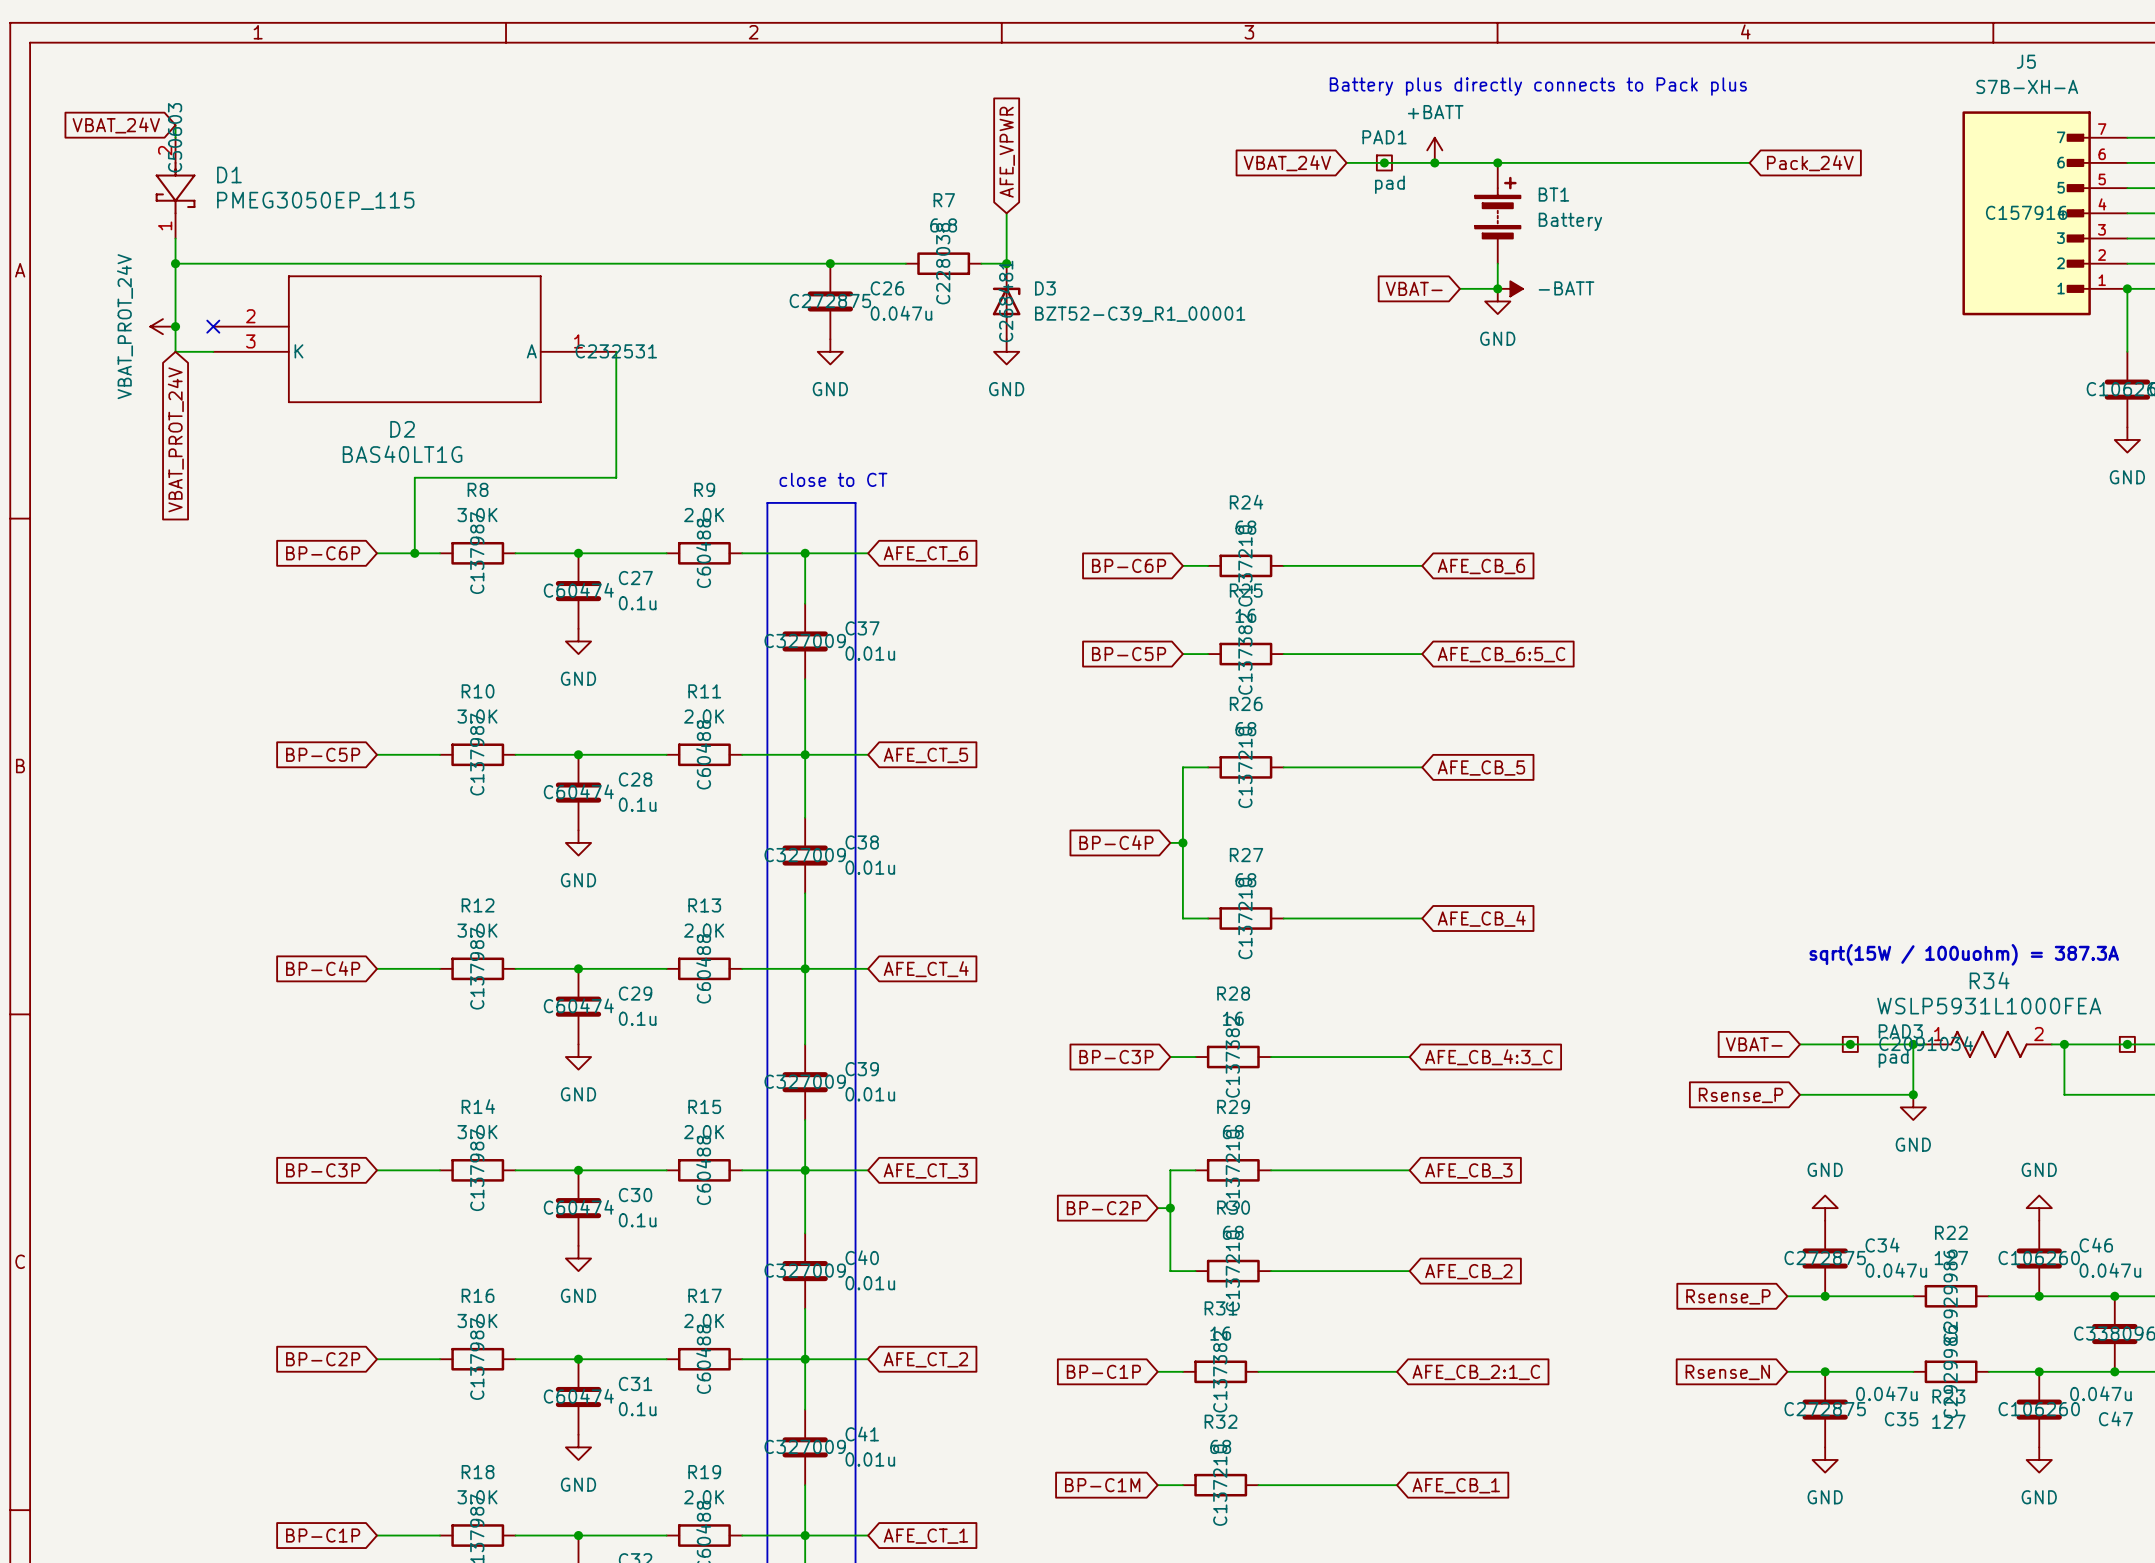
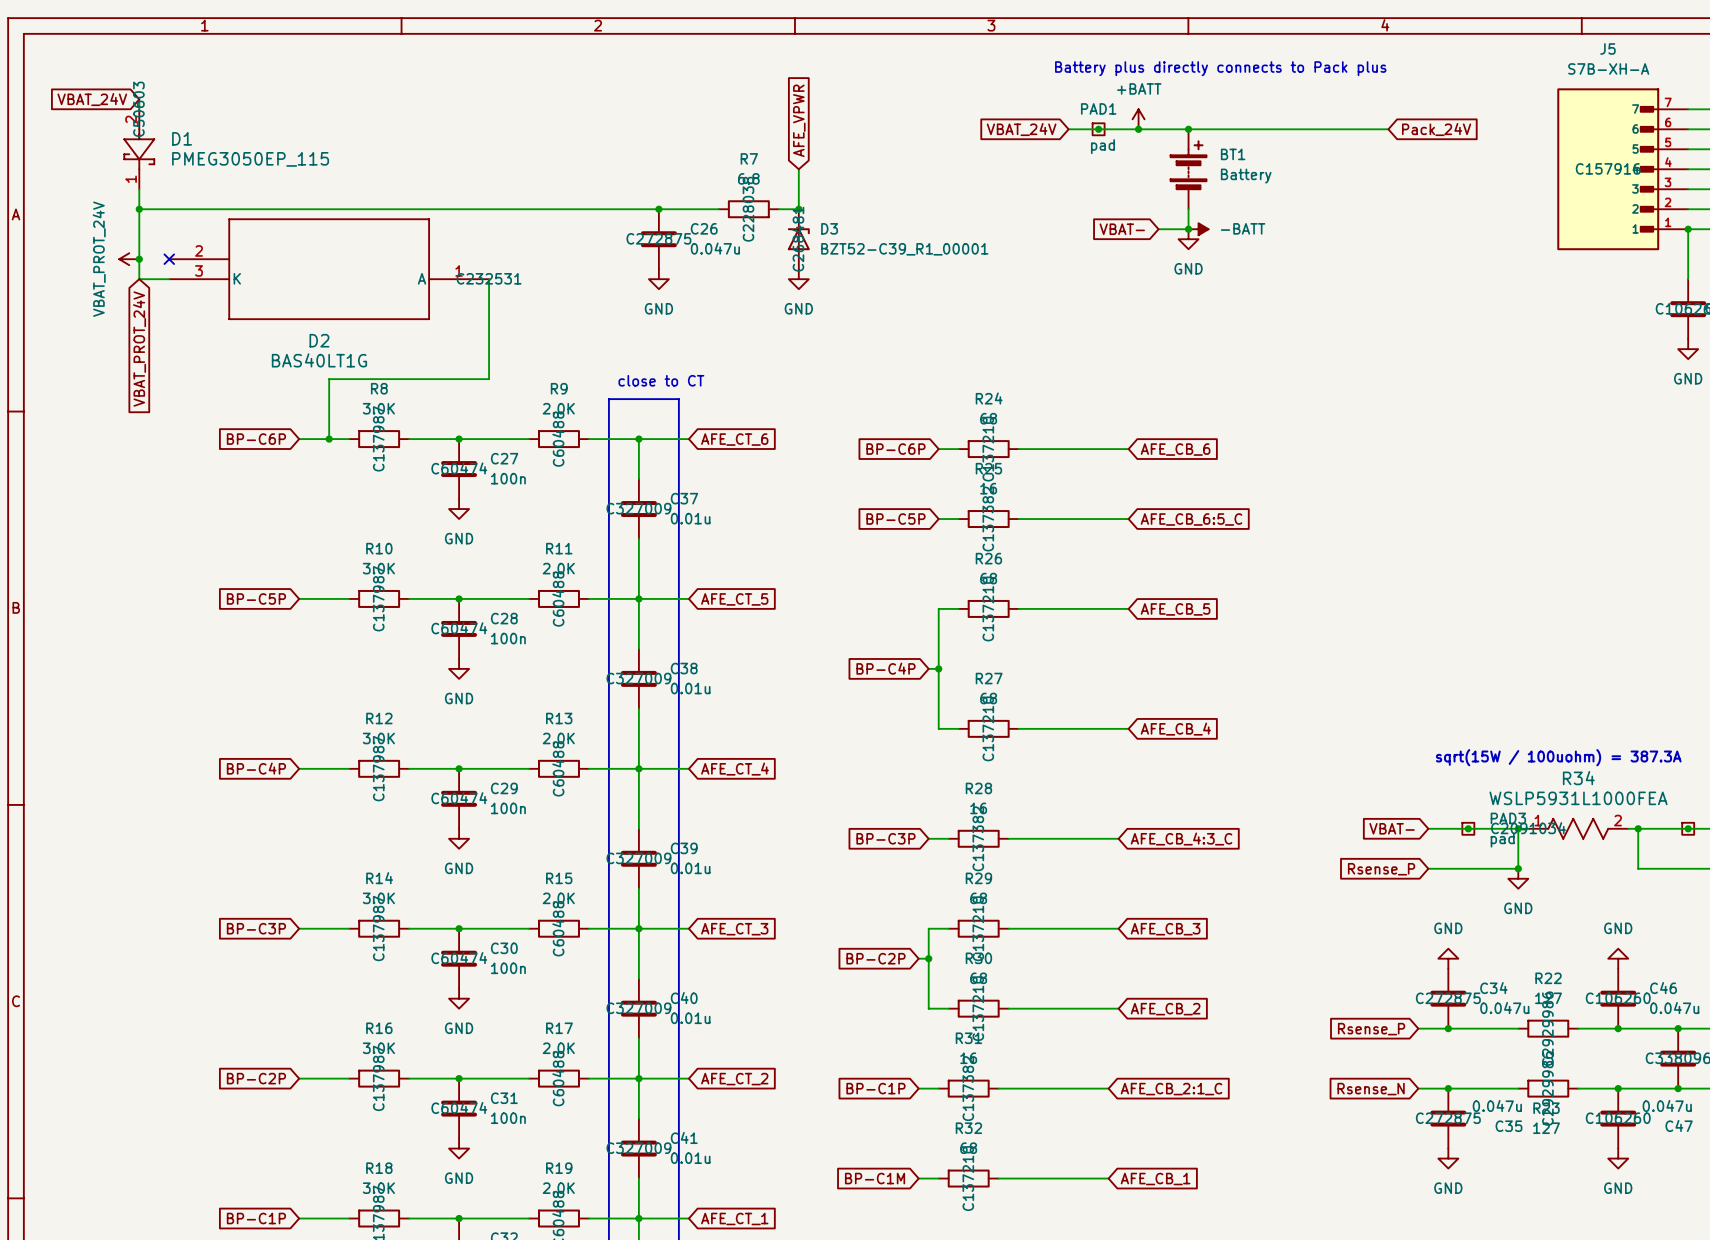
C27 value: 0.1u (637, 603) -> 100n (508, 478)
C28 value: 0.1u (637, 804) -> 100n (508, 638)
C29 value: 0.1u (637, 1018) -> 100n (508, 808)
C30 value: 0.1u (637, 1220) -> 100n (508, 968)
C31 value: 0.1u (637, 1409) -> 100n (508, 1118)

